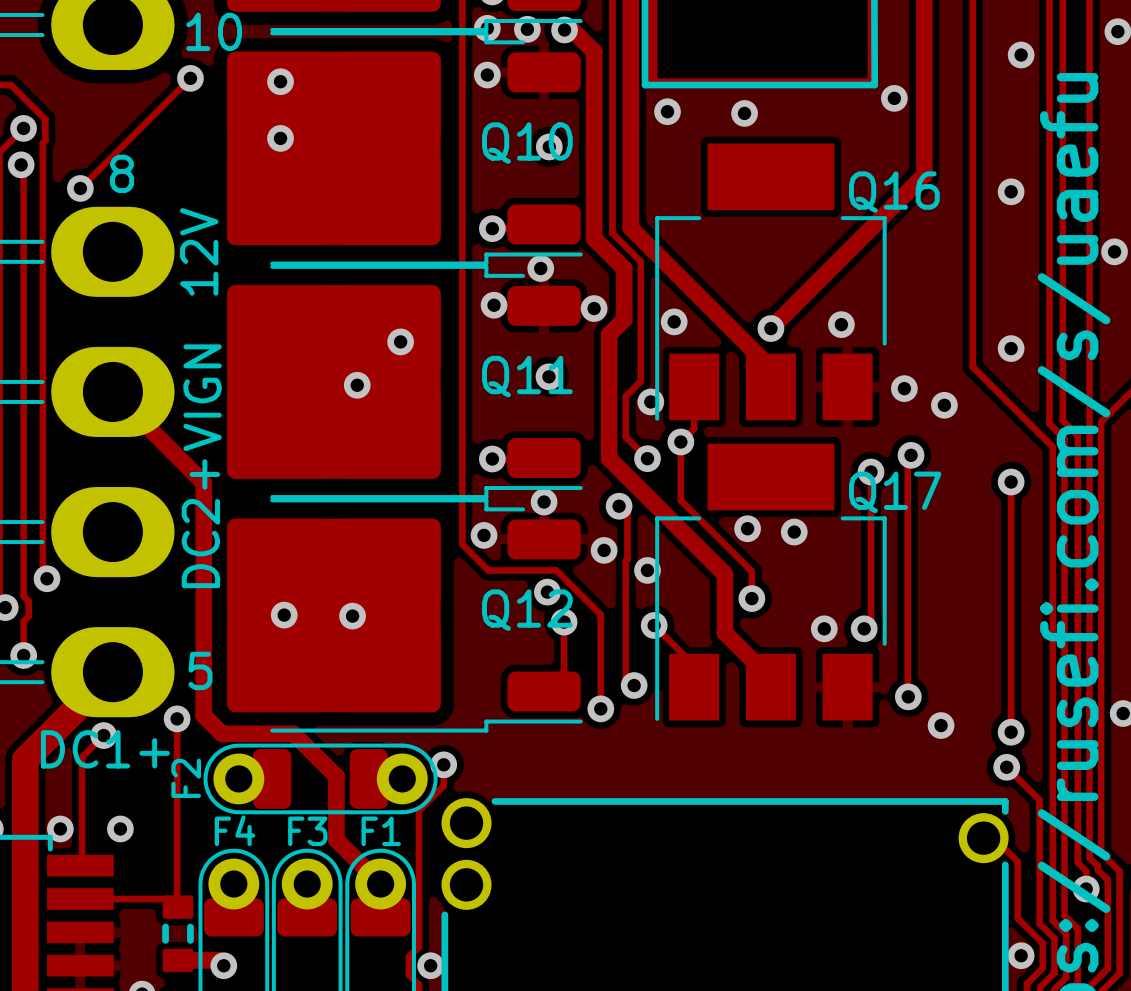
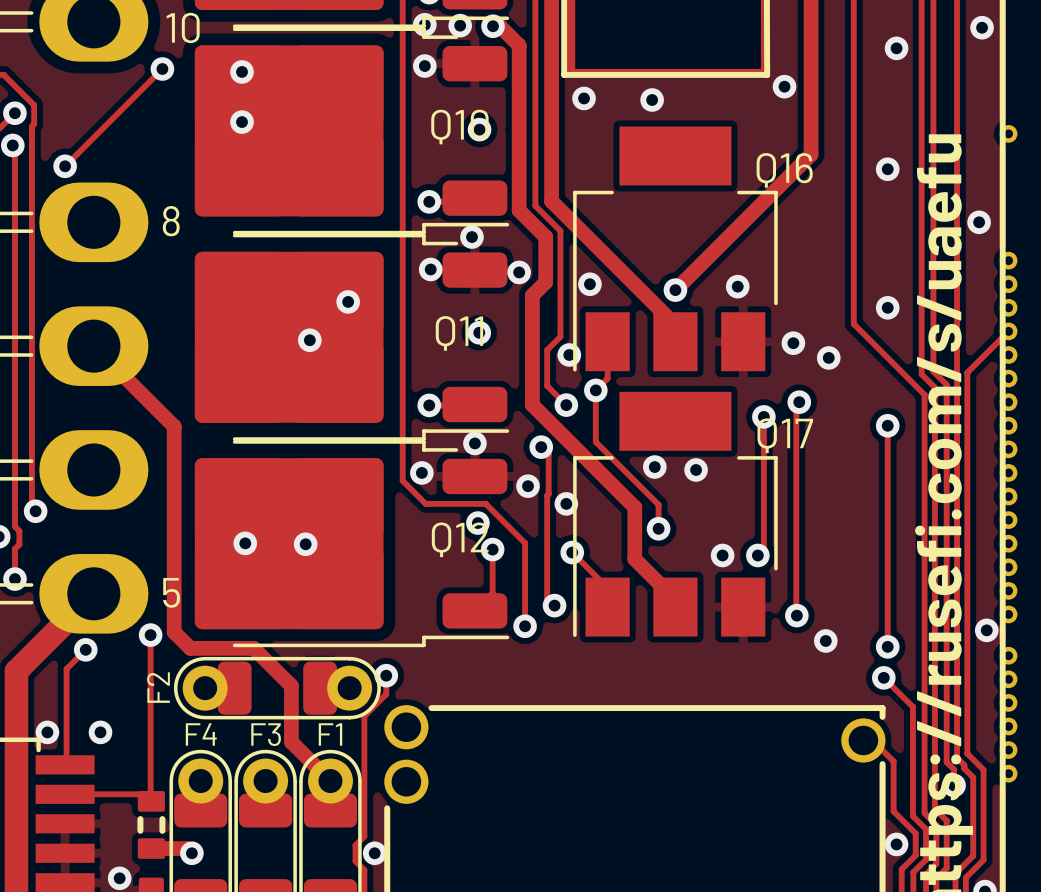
text: 8 (122, 173) -> none
text: 12V (199, 251) -> 8 (171, 221)
text: VIGN (202, 397) -> none
text: DC2+ (200, 523) -> none
text: DC1+ (105, 749) -> none

